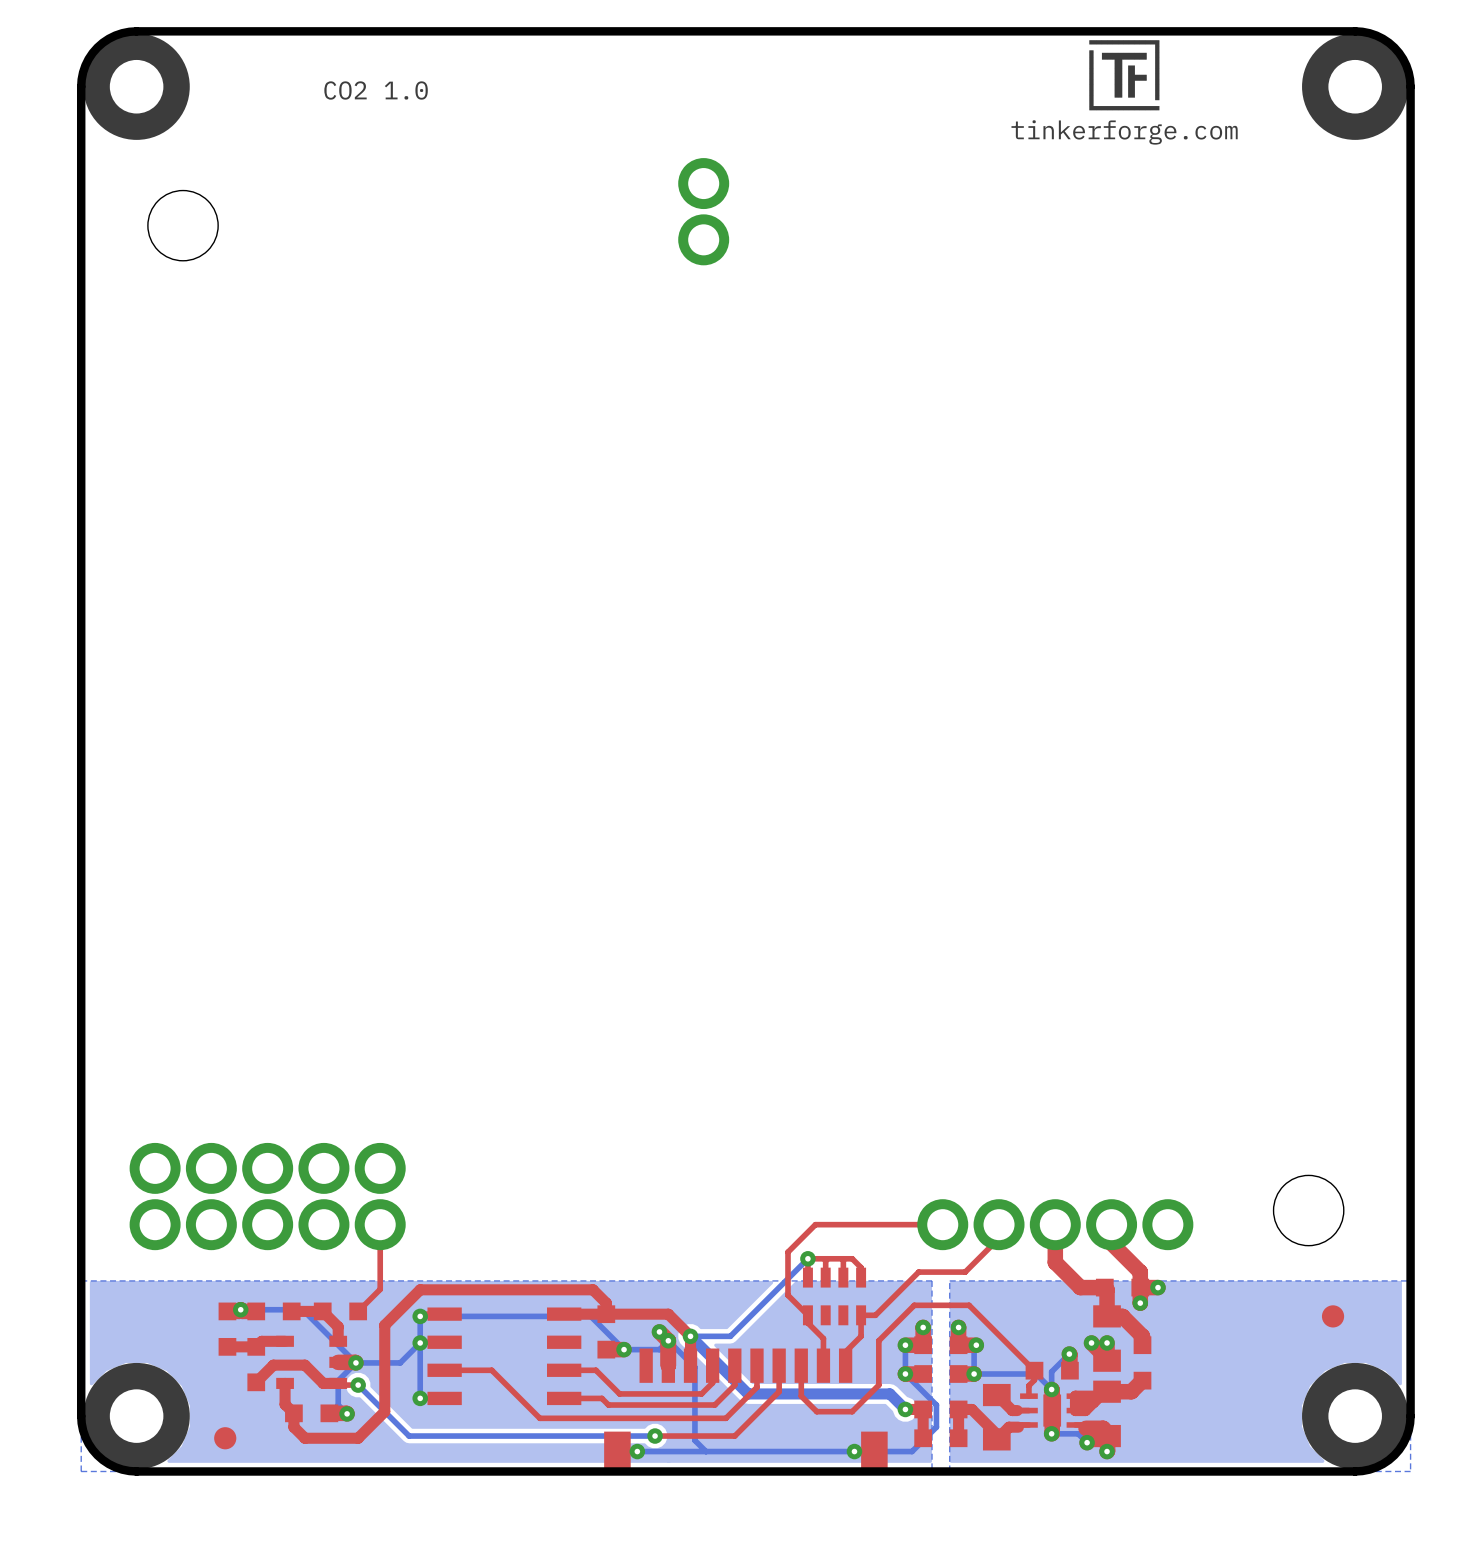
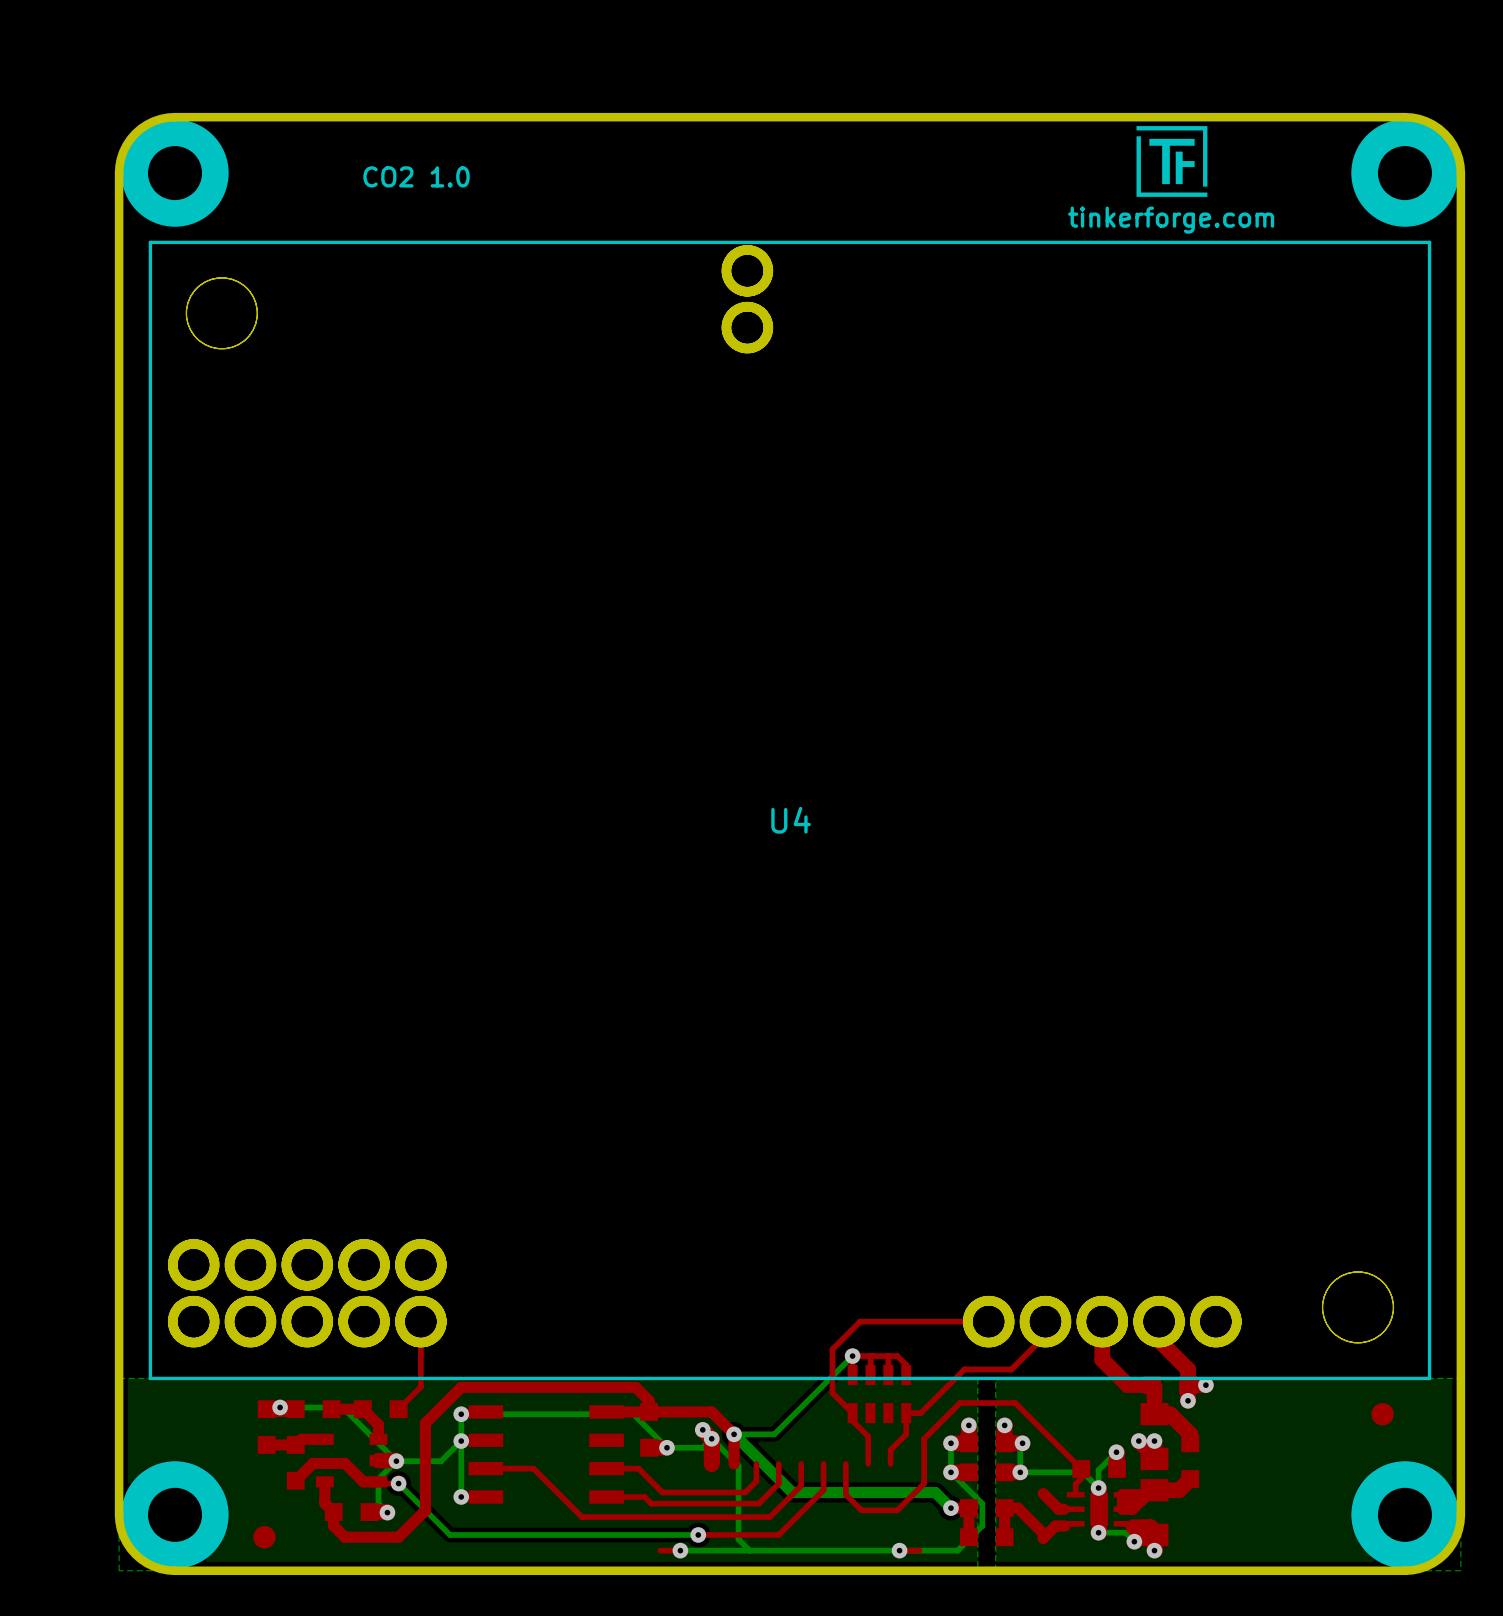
U4: none -> (789, 810)
part: (745, 1410) -> none
part: (996, 1417) -> none

